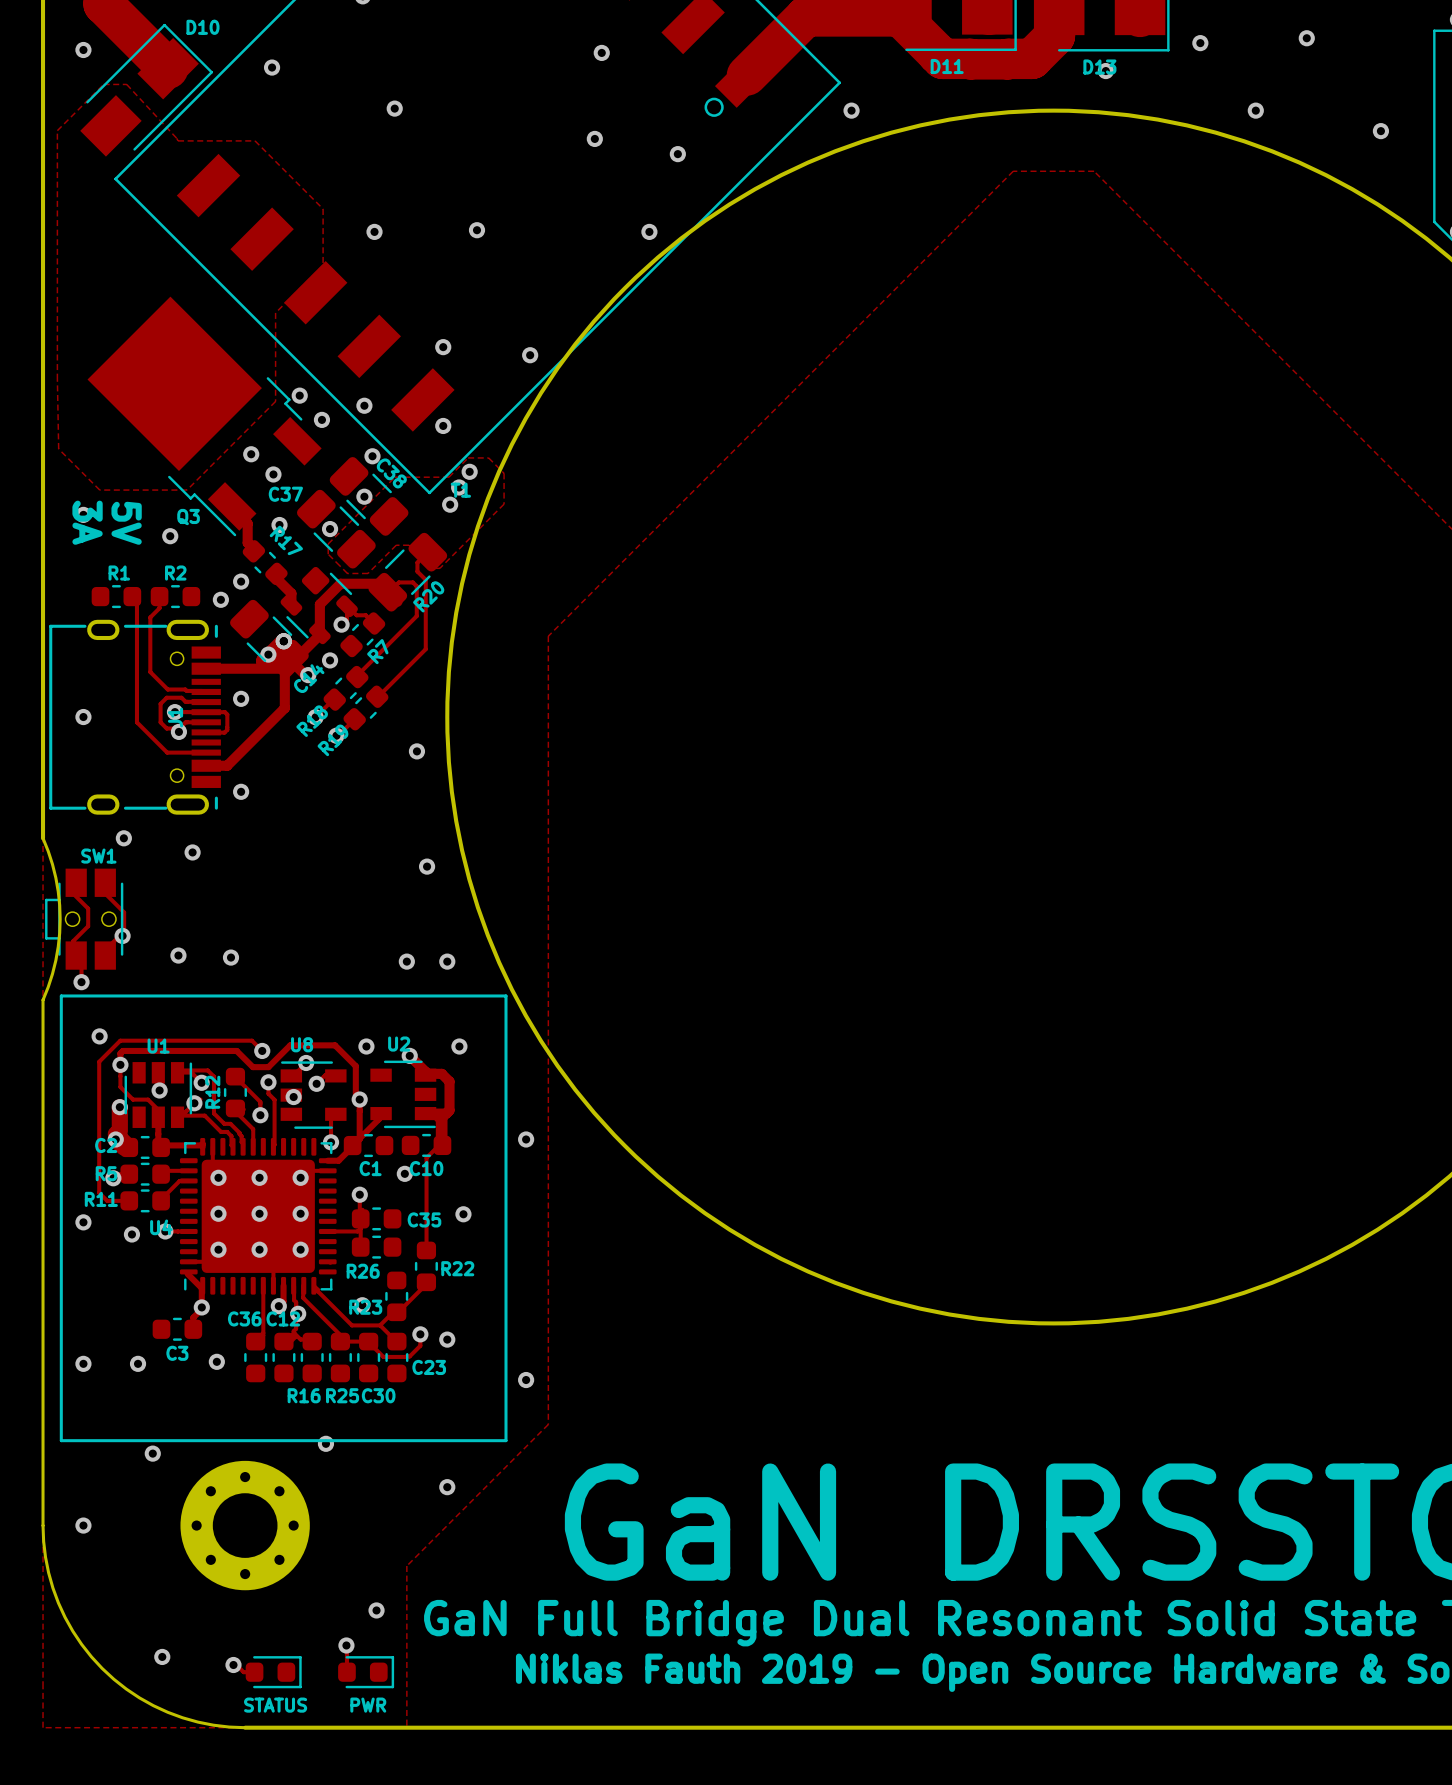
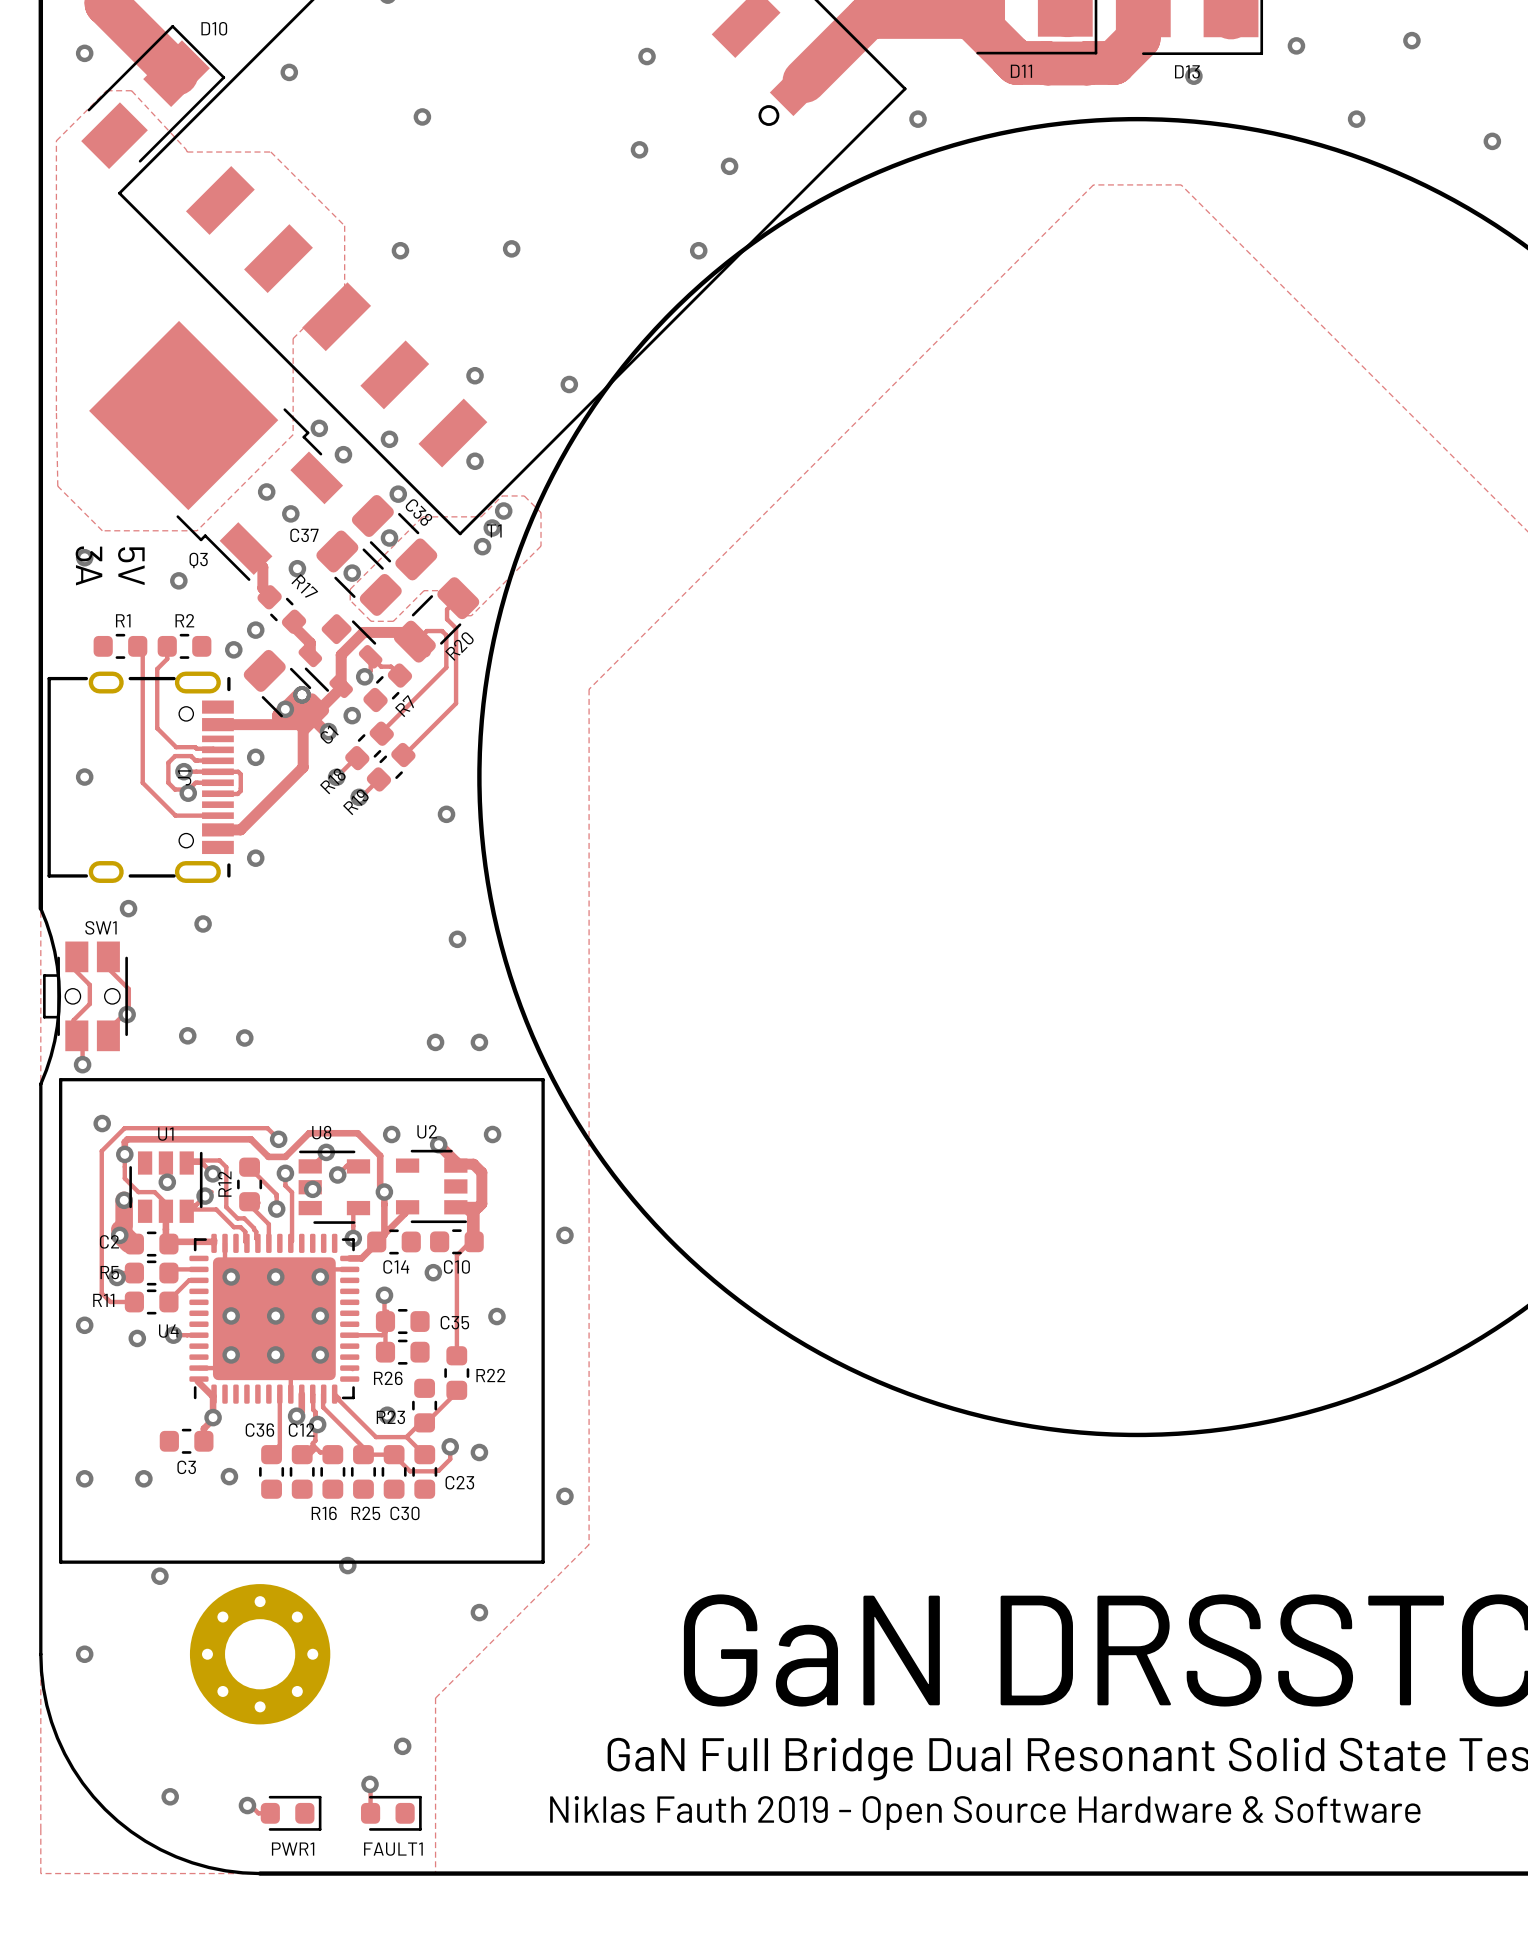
C14 name: C14 (309, 678) -> C1 (329, 734)
C1 name: C1 (370, 1168) -> C14 (396, 1266)
STATUS name: STATUS (275, 1705) -> PWR1 (293, 1849)
PWR name: PWR (368, 1705) -> FAULT1 (393, 1849)

